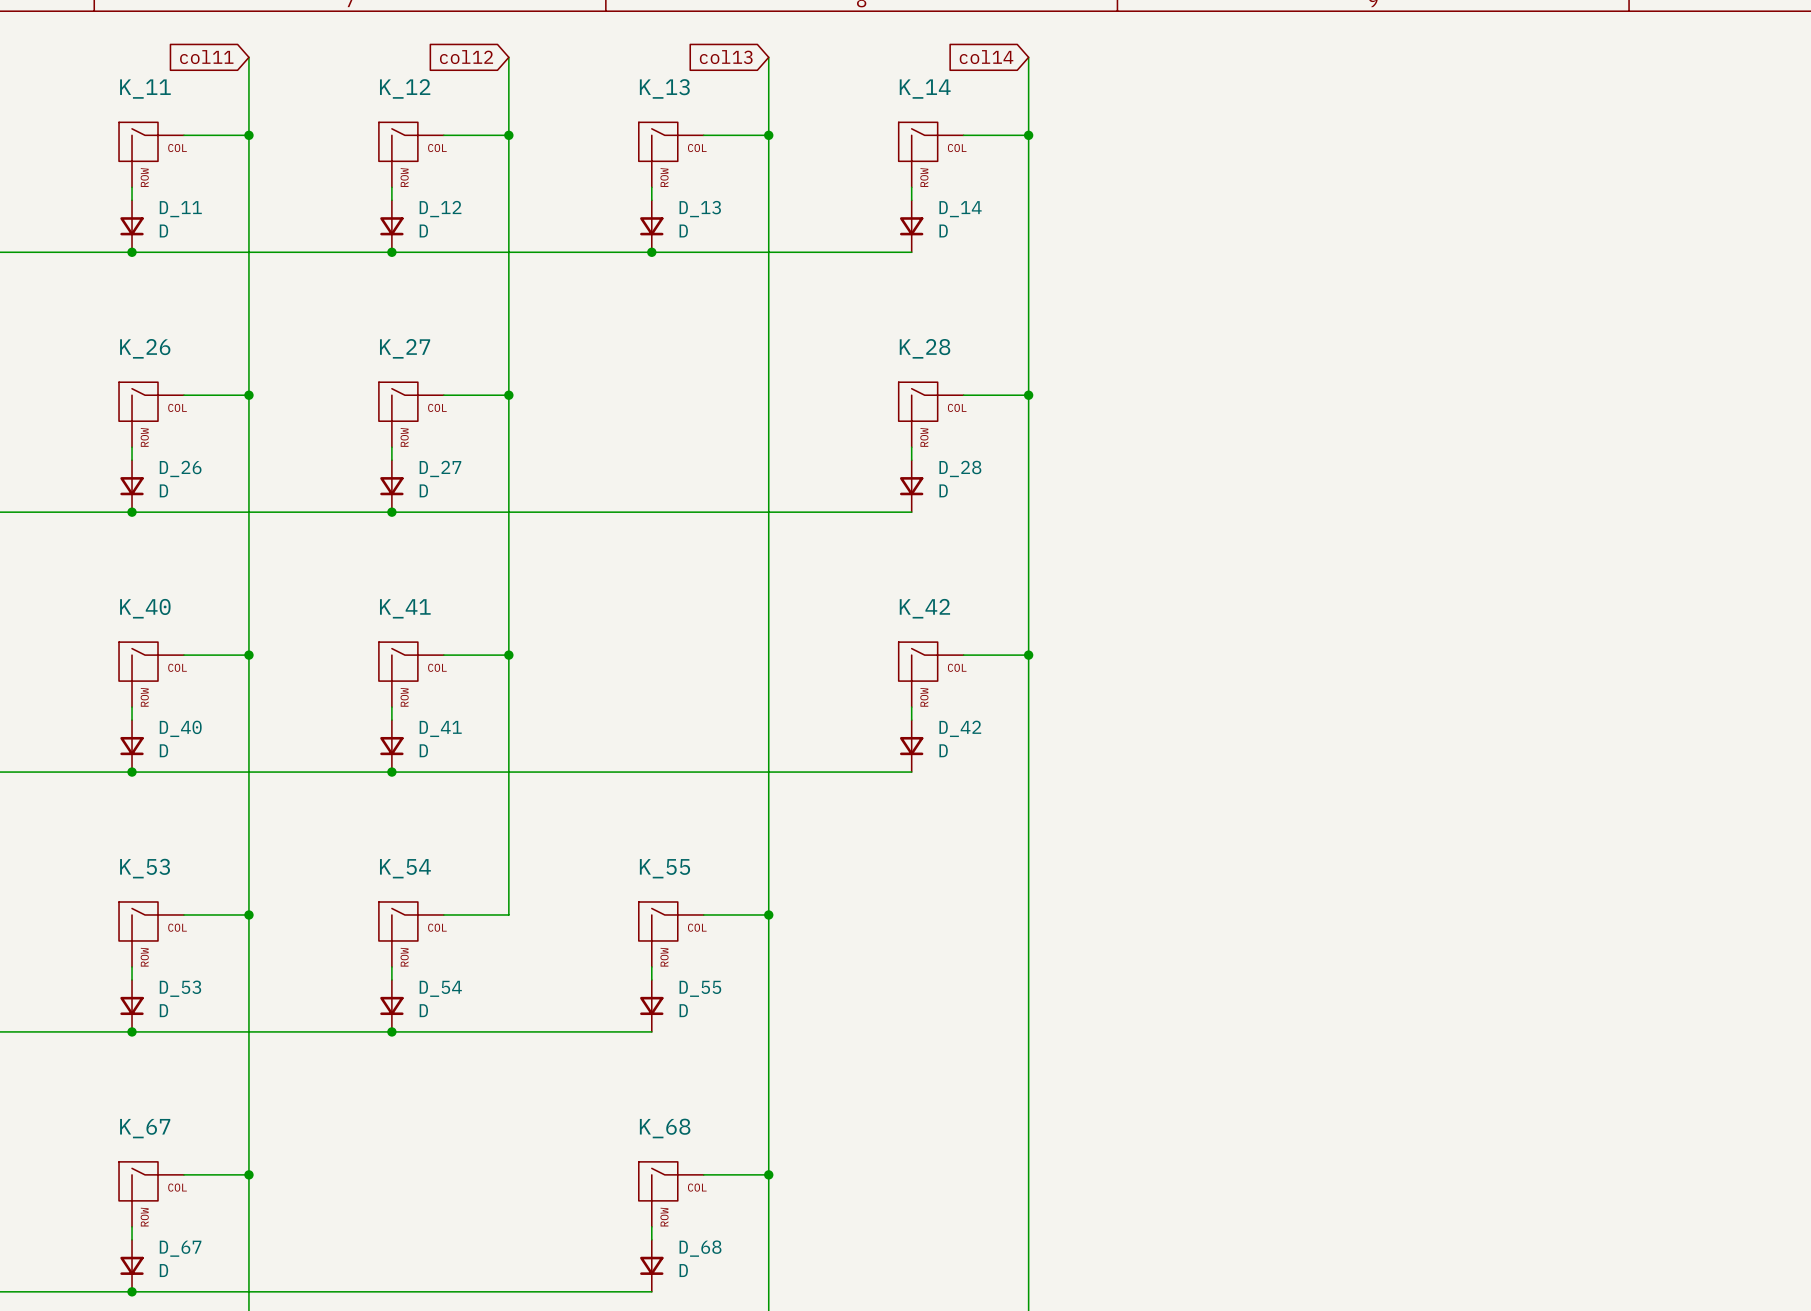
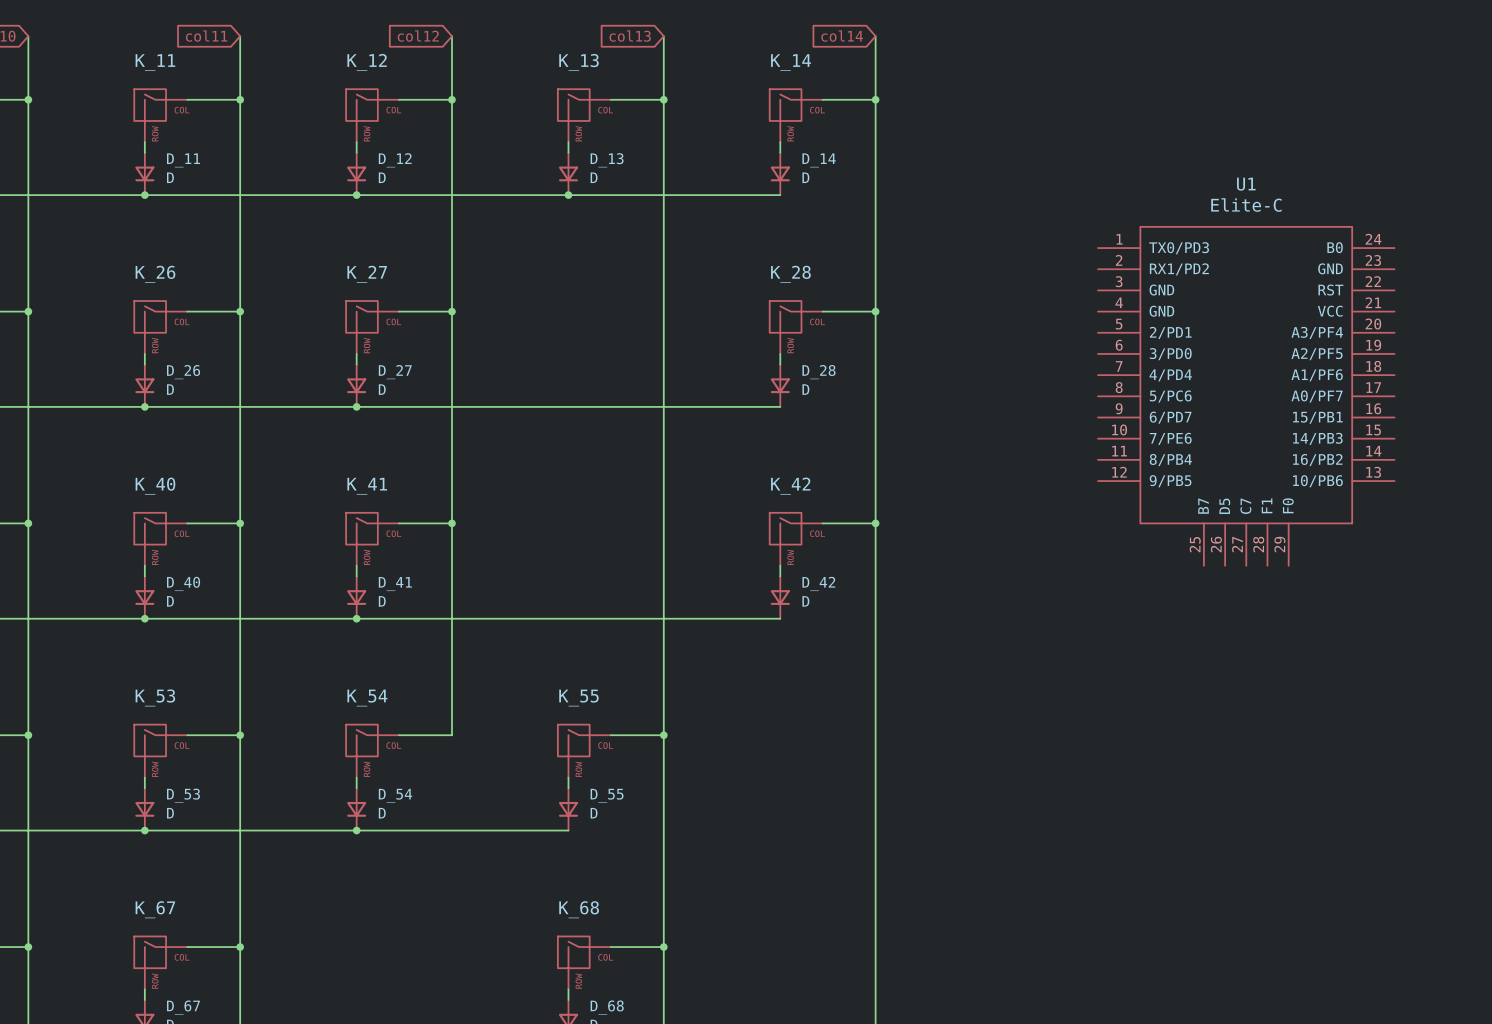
U1: none -> Elite-C (1246, 396)

